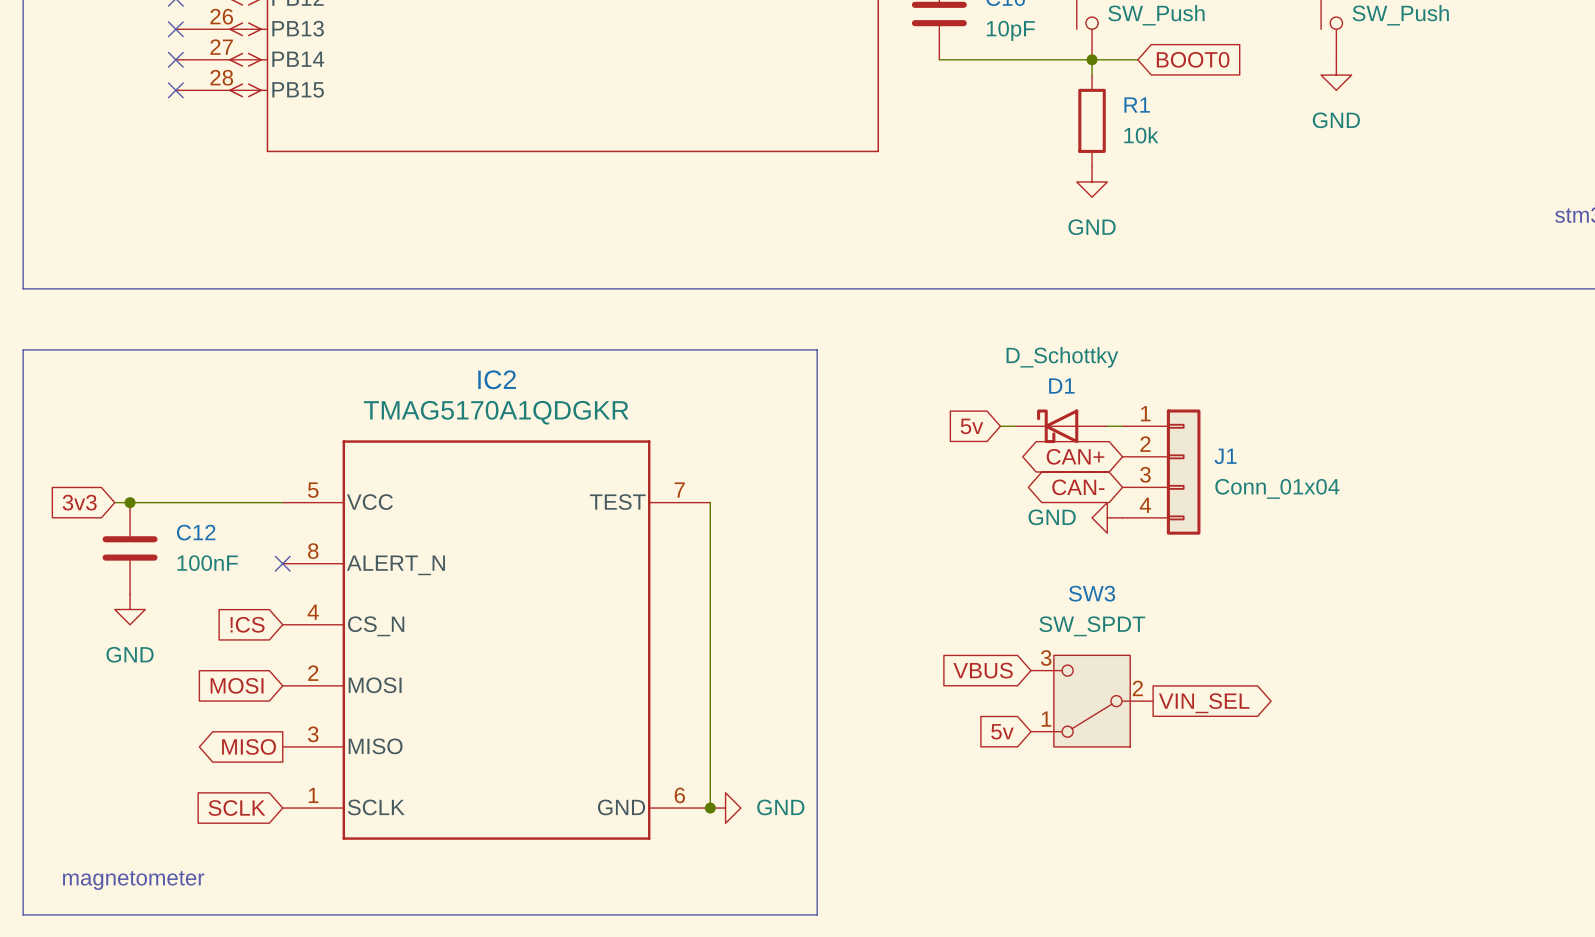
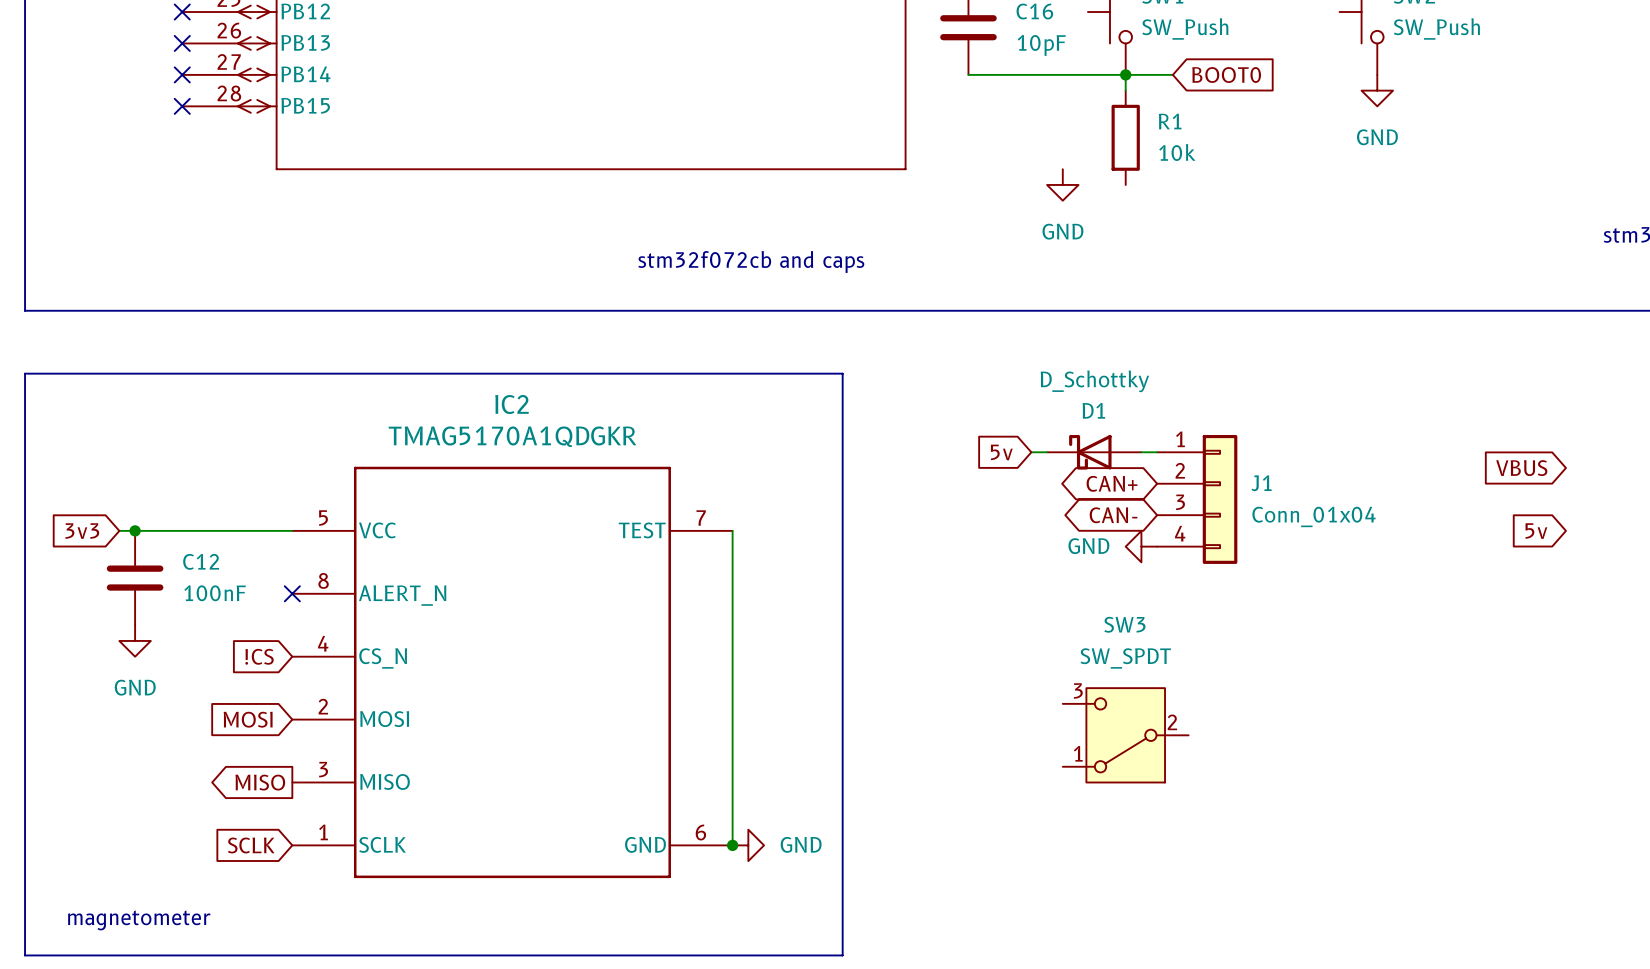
power symbol position: GND (1092, 181) -> GND (1062, 184)
text: none -> stm32f072cb and caps (751, 261)
global label: none -> VBUS (1521, 468)
global label: none -> 5v (1536, 531)
global label: VBUS (983, 670) -> none
global label: VIN_SEL (1204, 703) -> none
global label: 5v (1002, 731) -> none

